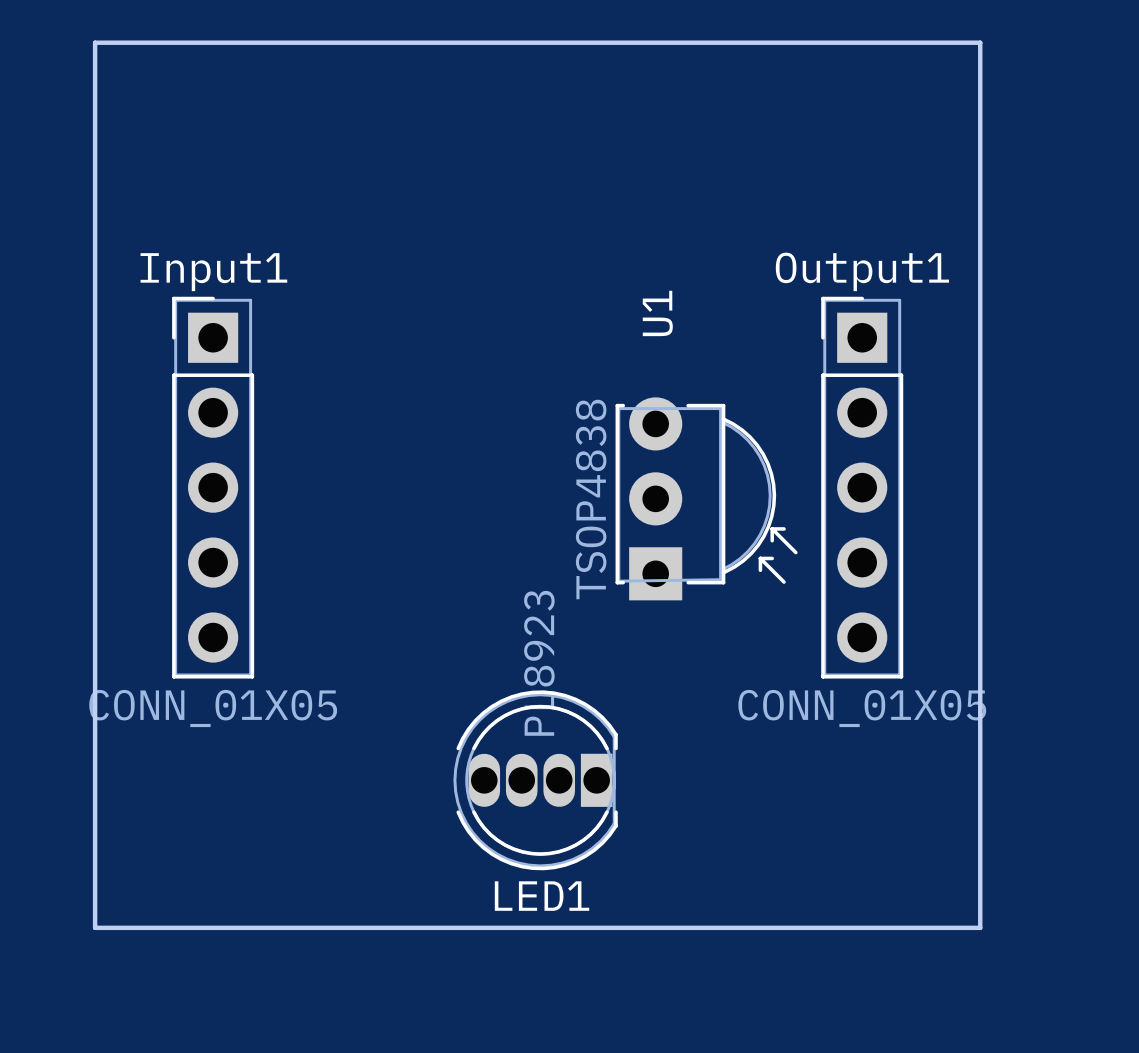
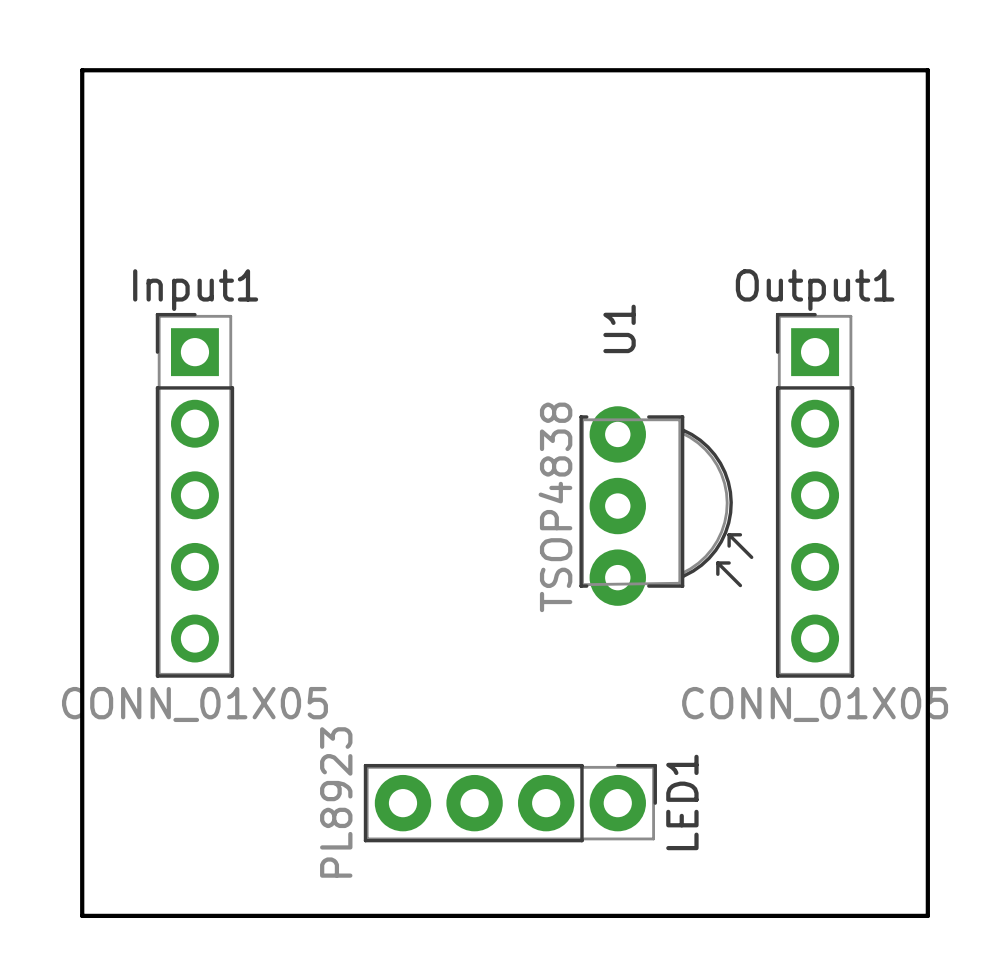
U1 footprint: [615, 397, 798, 601] -> [579, 406, 754, 606]
LED1 value position: PL8923 (539, 663) -> PL8923 (336, 802)
LED1 footprint: [453, 690, 618, 871] -> [363, 763, 657, 843]
LED1 name position: LED1 (542, 896) -> LED1 (682, 802)

